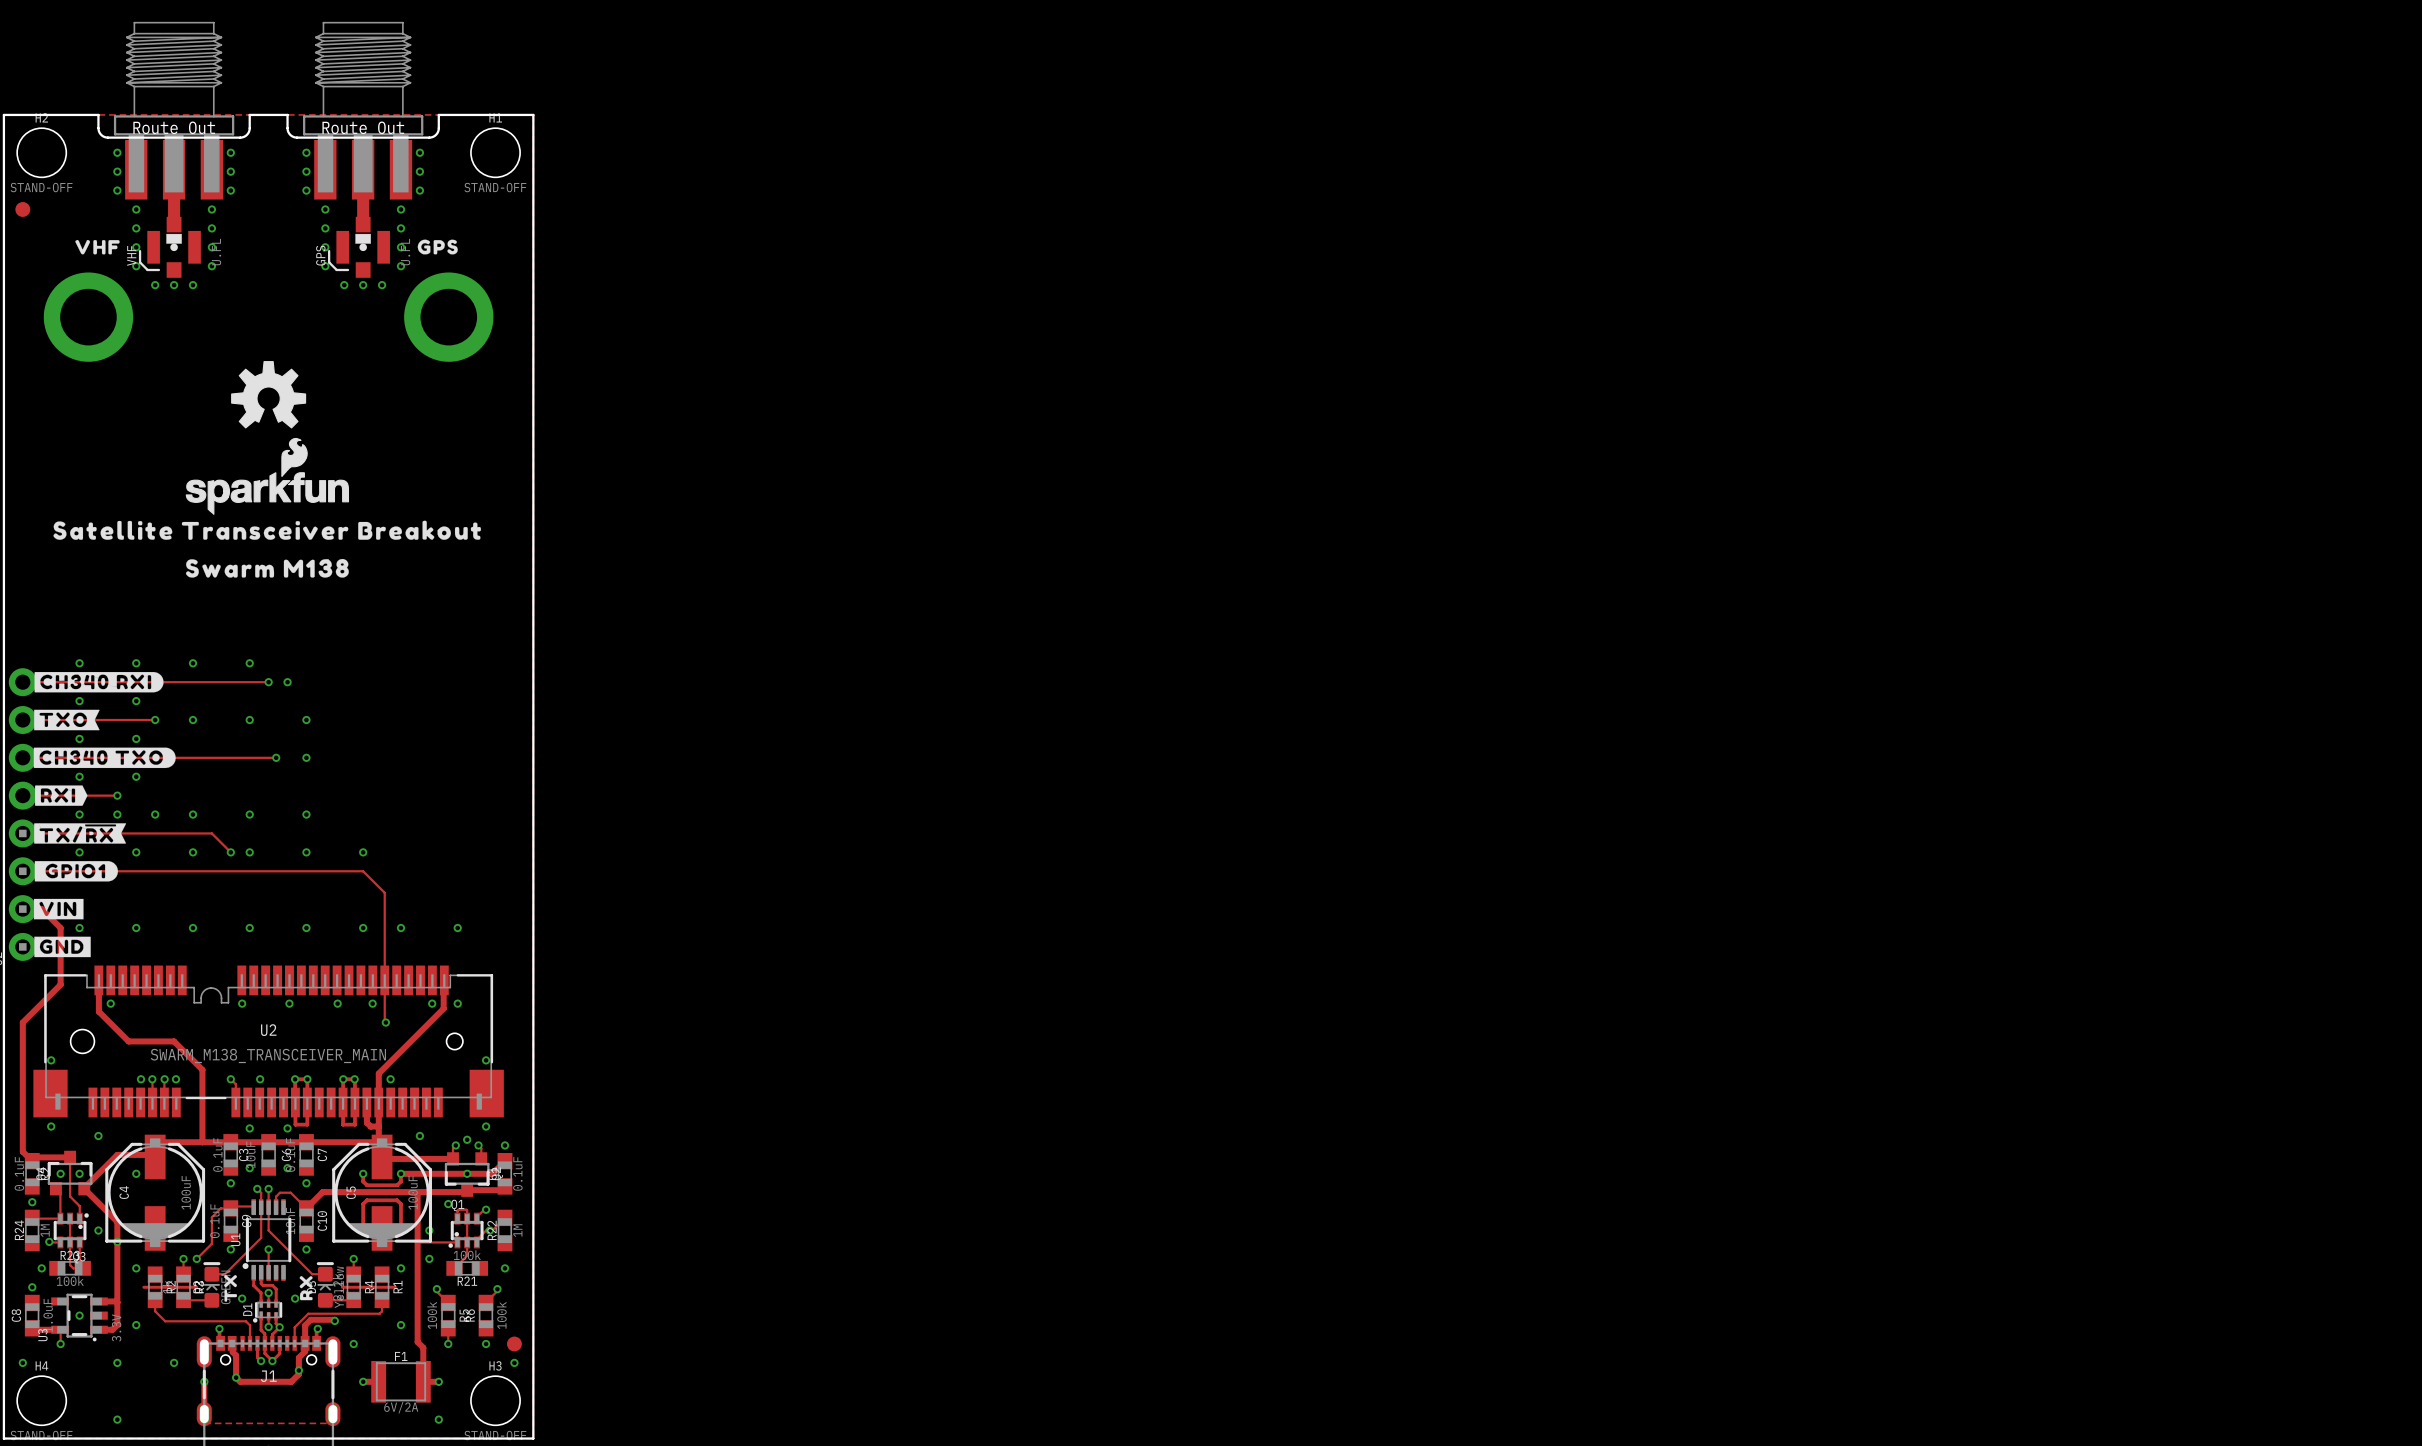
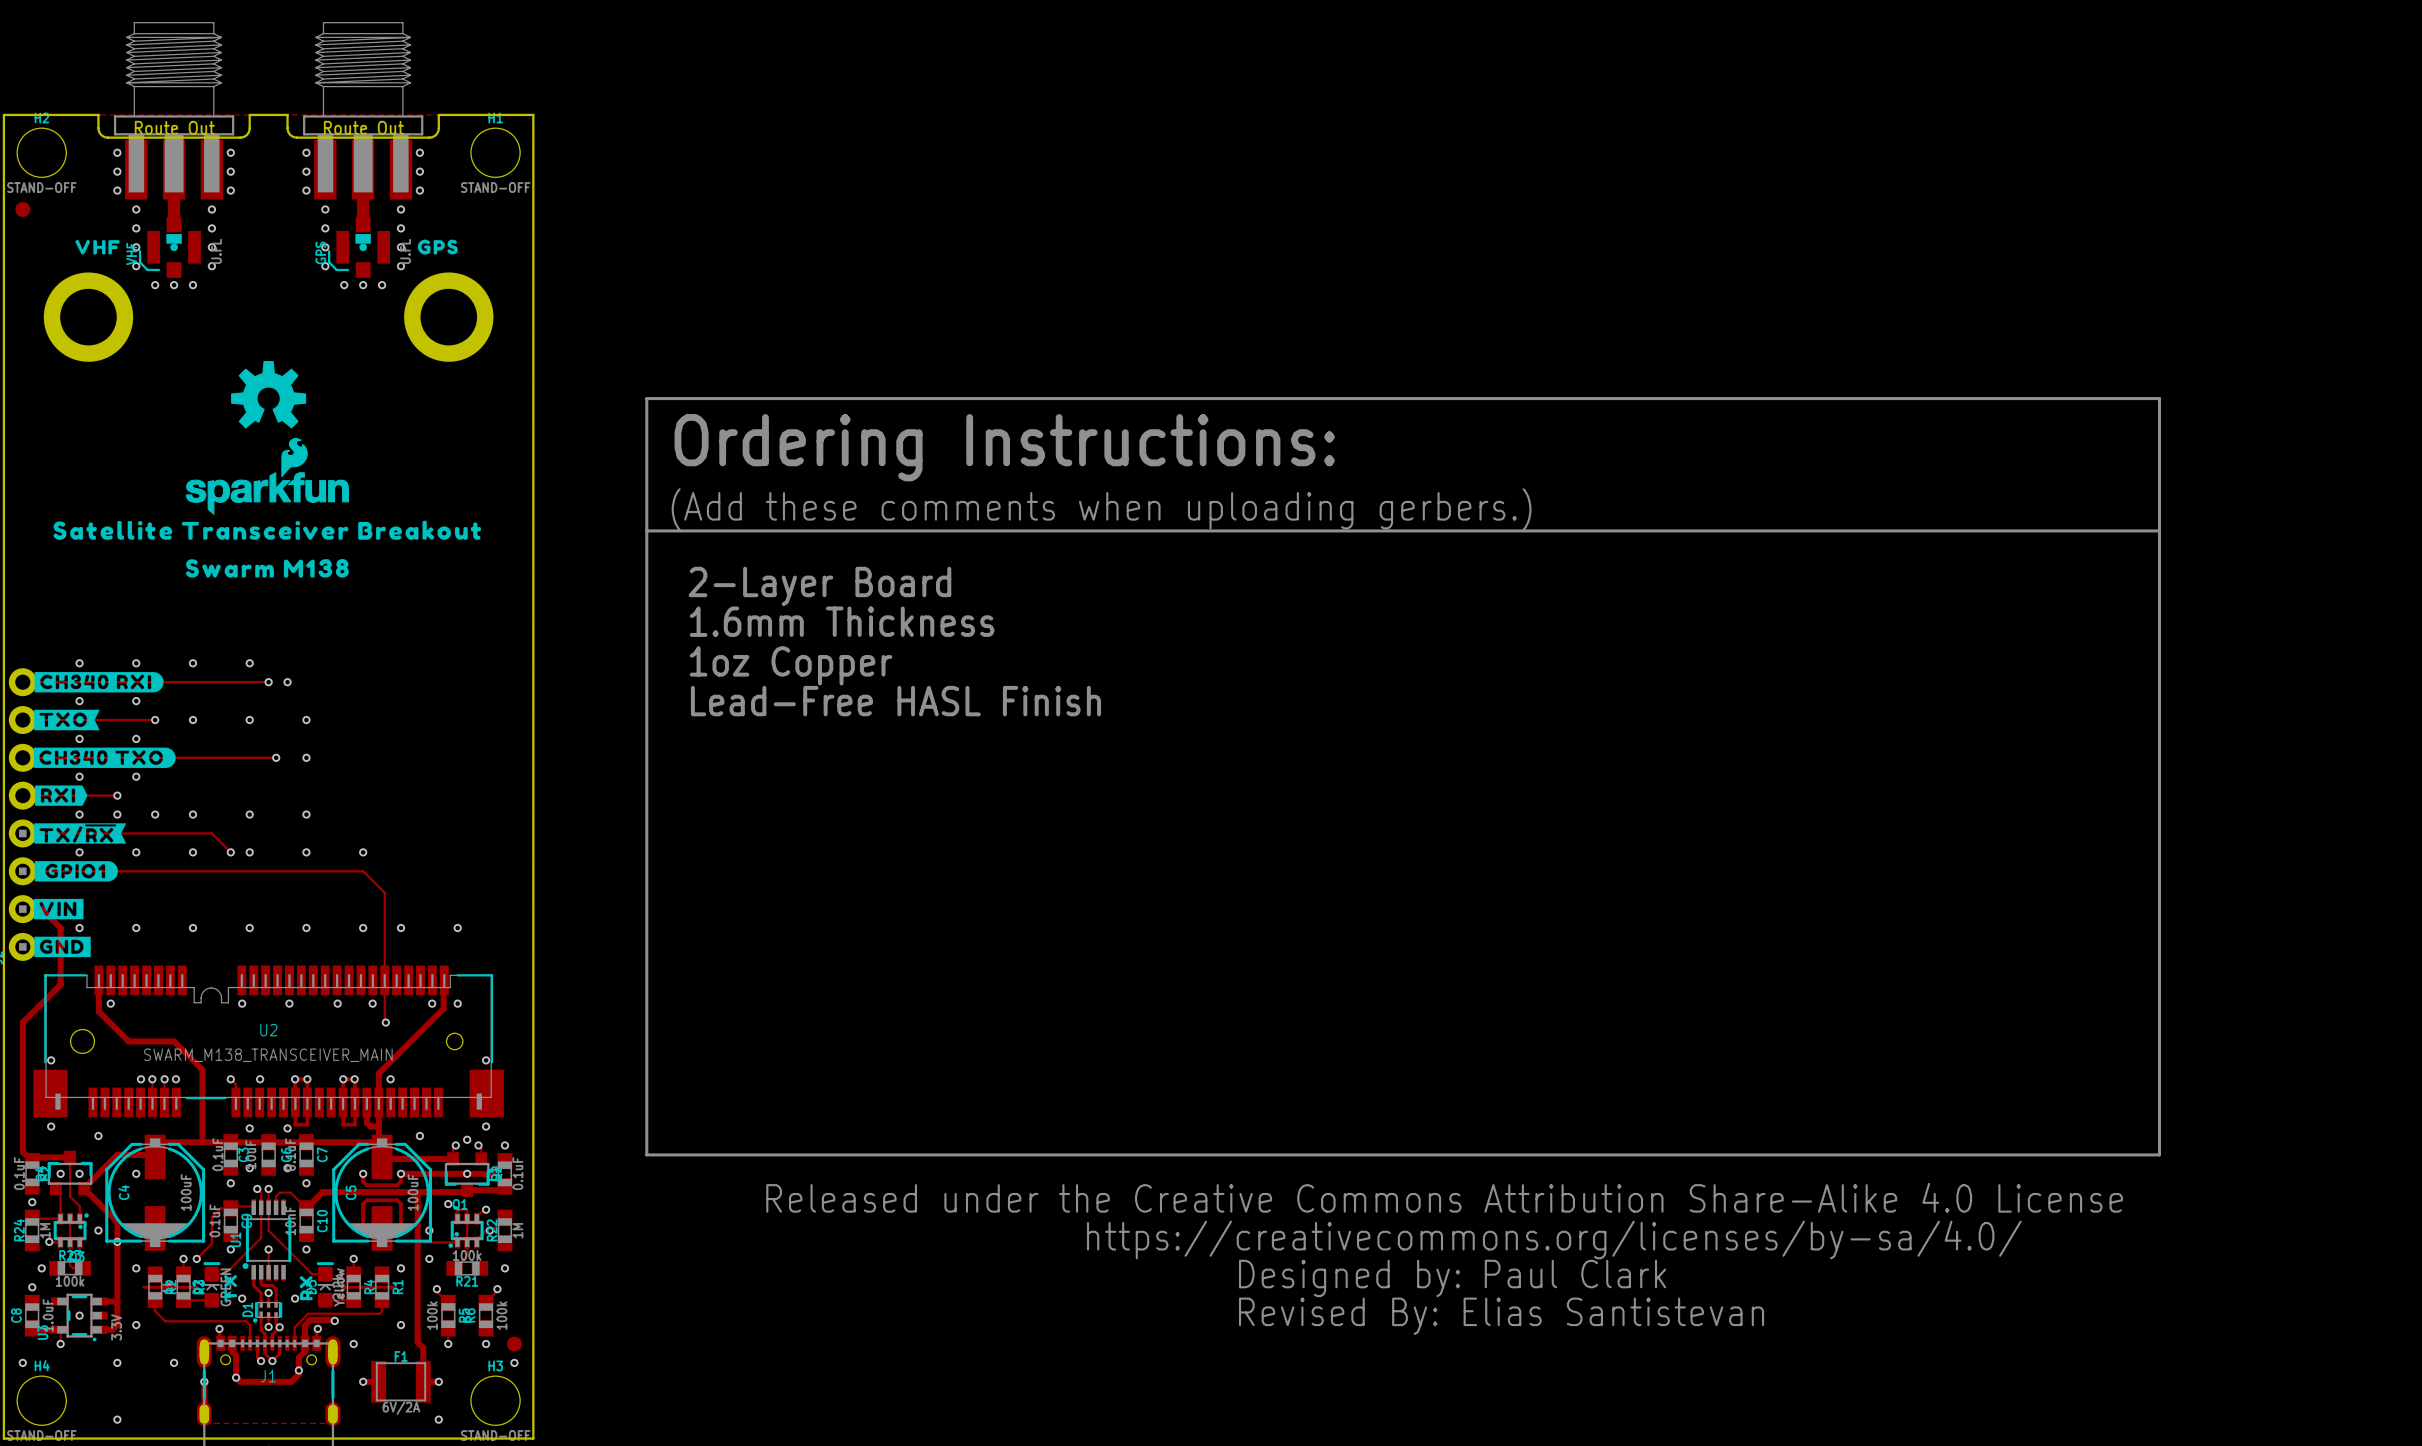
drawing: none -> [645, 397, 2161, 1157]
text: none -> 2-Layer Board (819, 586)
text: none -> 1.6mm Thickness (842, 621)
text: none -> 1oz Copper (791, 665)
text: none -> Lead-Free HASL Finish (895, 701)
text: none -> Paul Clark (1575, 1274)
text: none -> Revised By: Elias Santistevan (1501, 1316)

